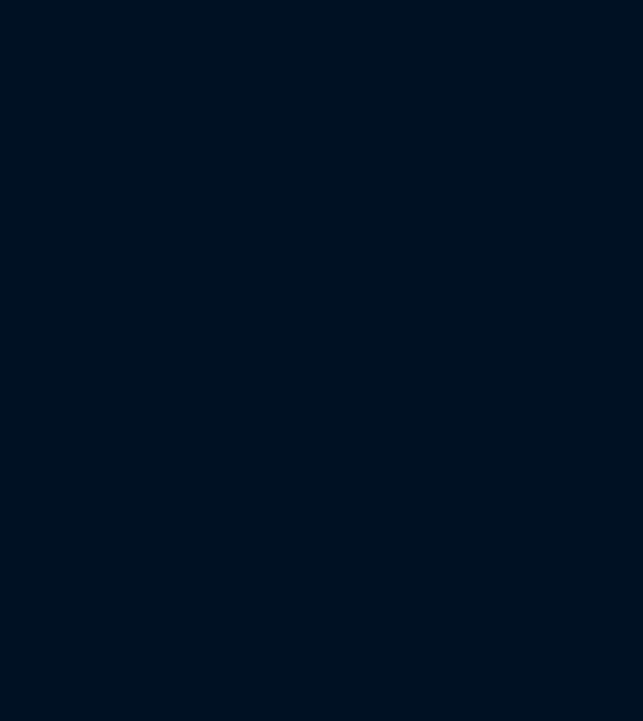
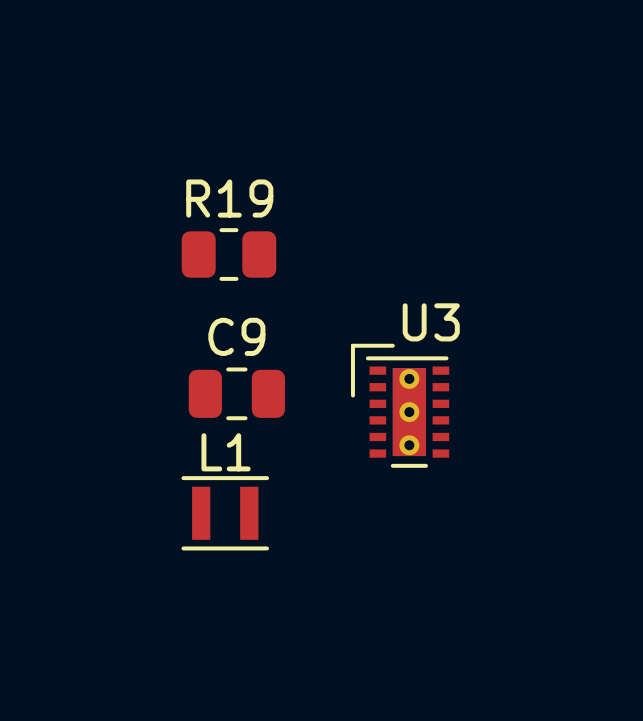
R19: none -> (228, 254)
C9: none -> (236, 393)
U3: none -> (400, 405)
L1: none -> (225, 513)

